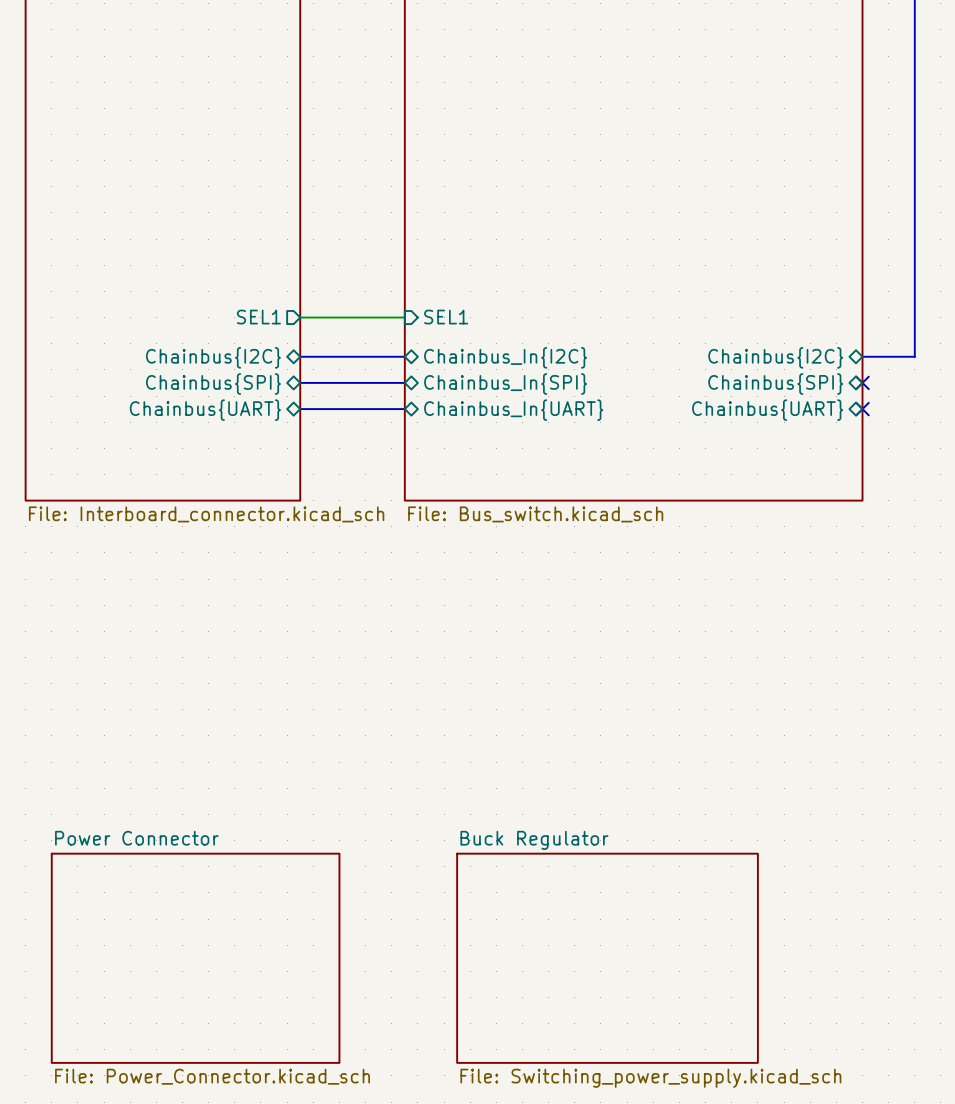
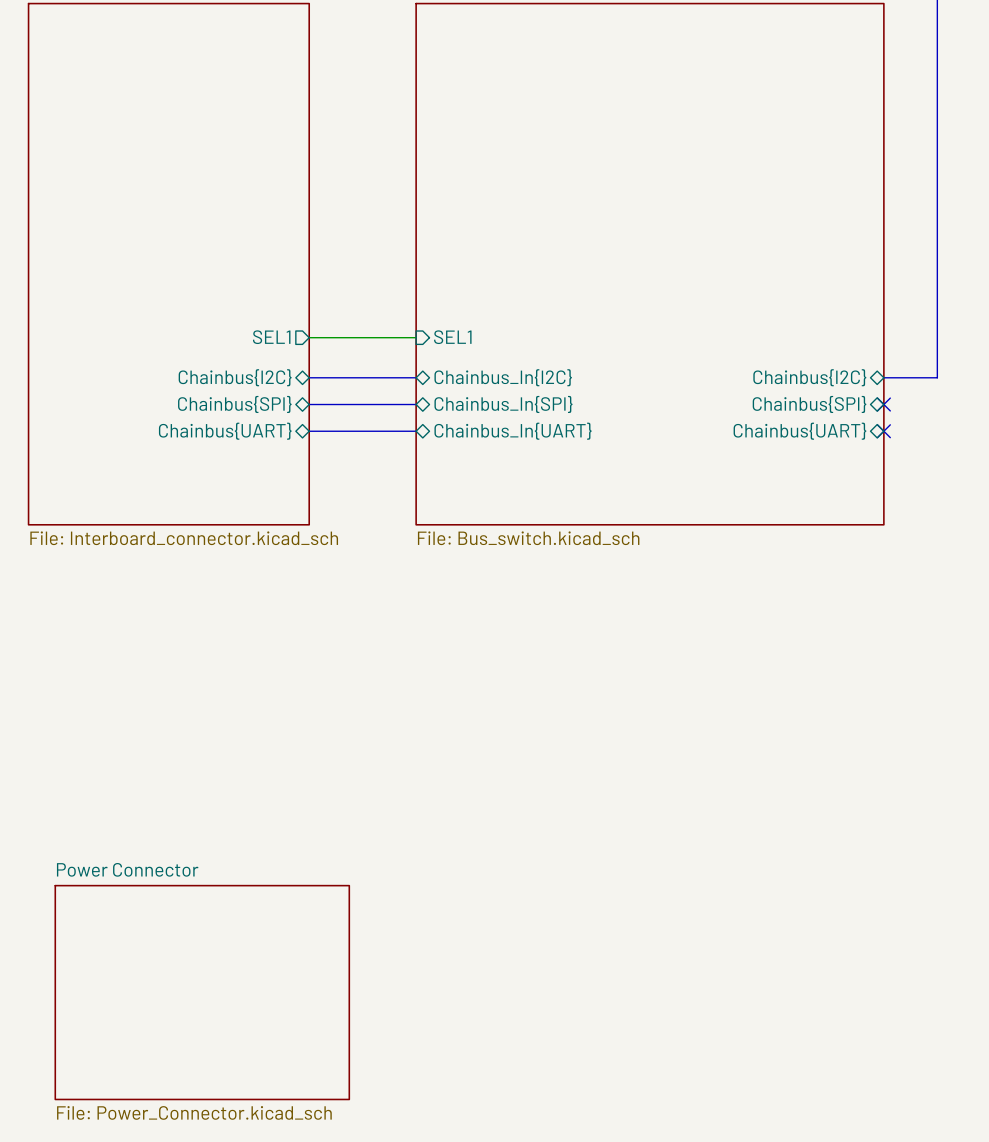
sheet Buck Regulator: File: Switching_power_supply.kicad_sch (607, 958) -> none

